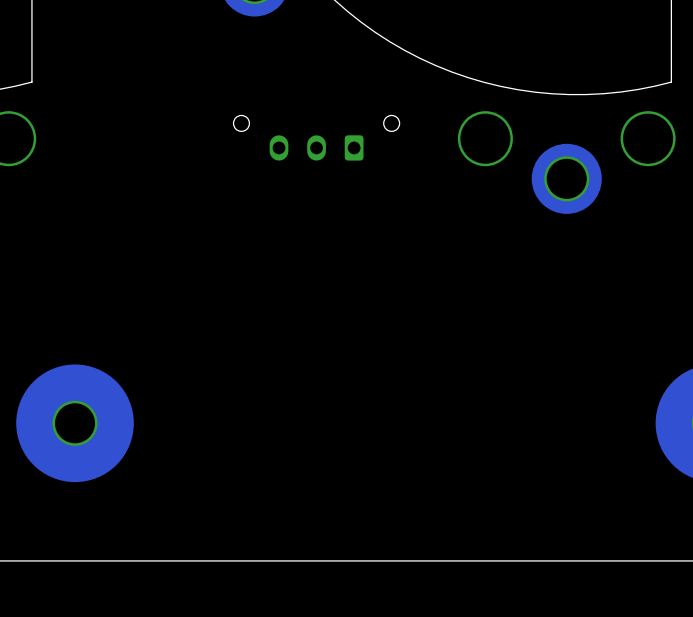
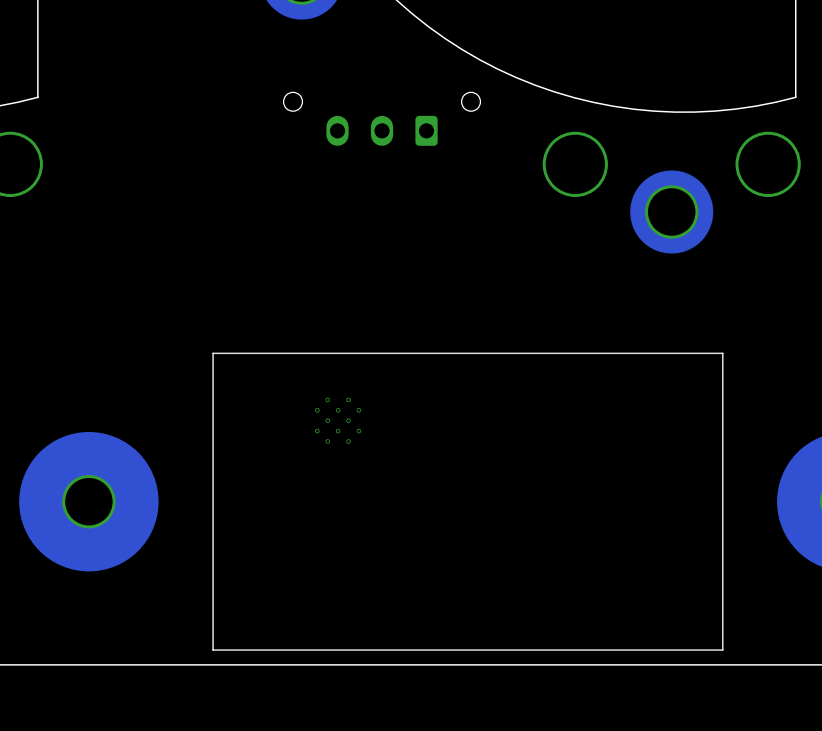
part position: (316, 138) -> (382, 119)
line: none -> (722, 353) (213, 353) (213, 650) (722, 650) (722, 353)
part: none -> (338, 420)

